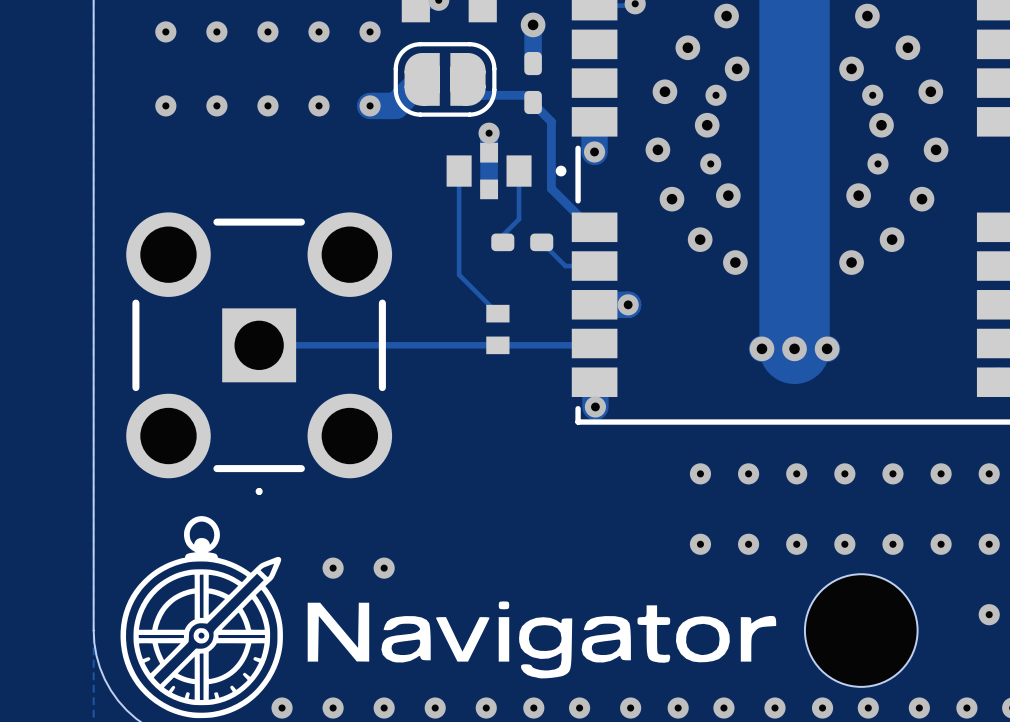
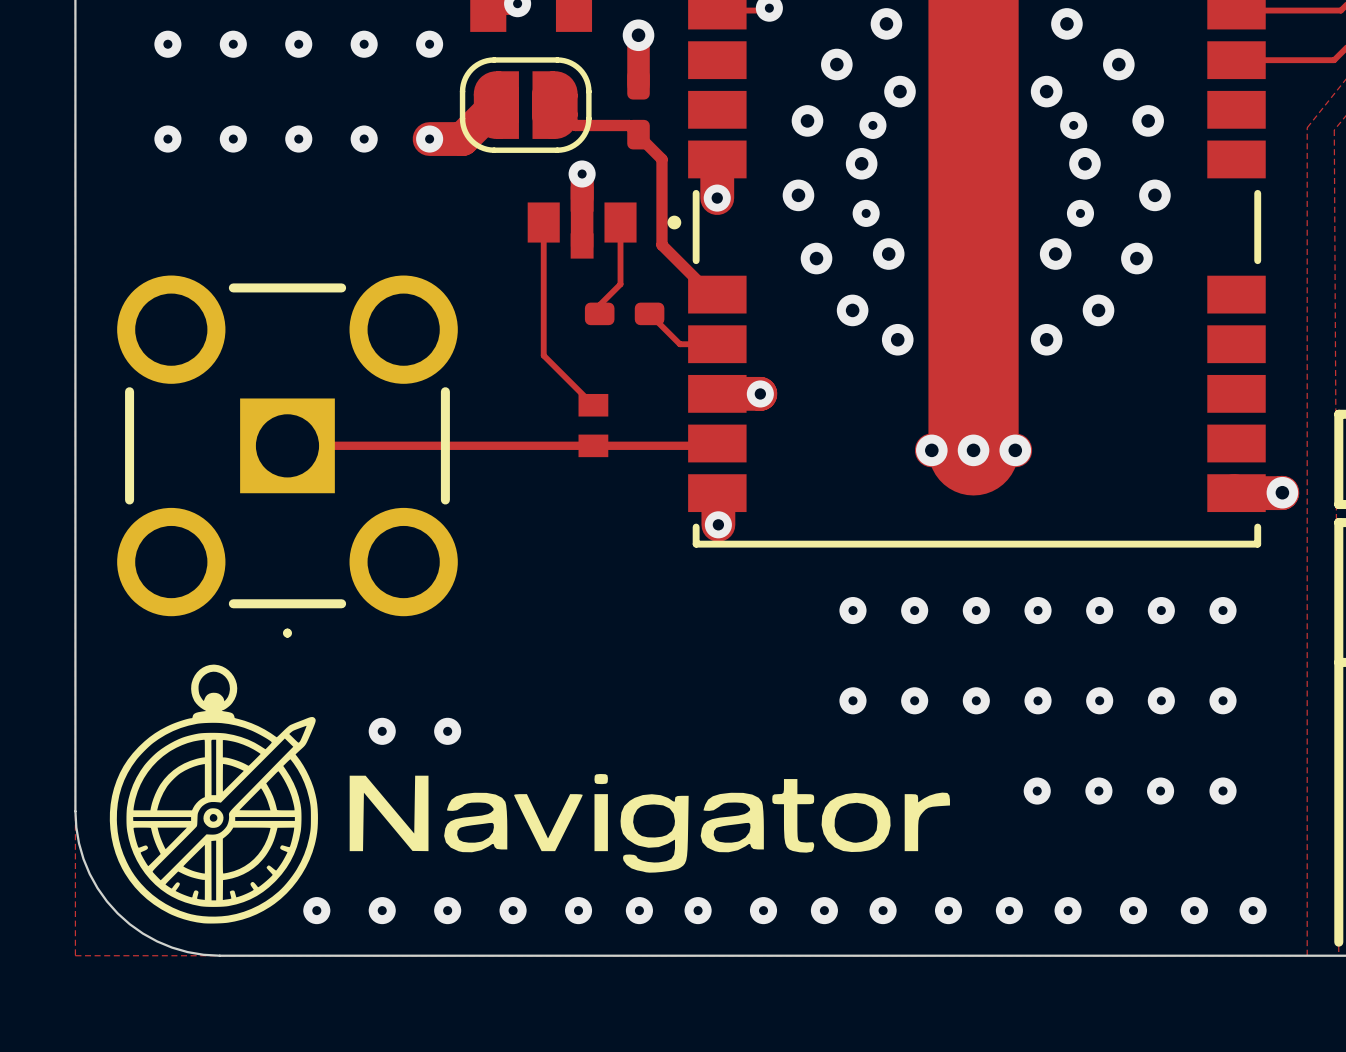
via: none -> (1037, 791)
via: none -> (1098, 791)
via: none -> (1160, 791)
part: (861, 630) -> none

